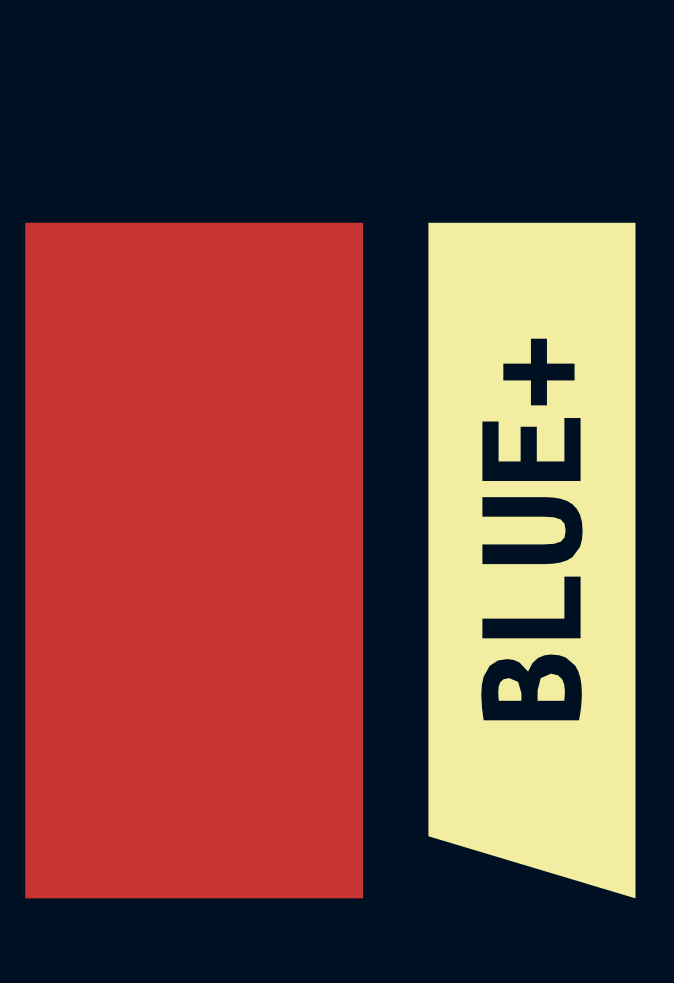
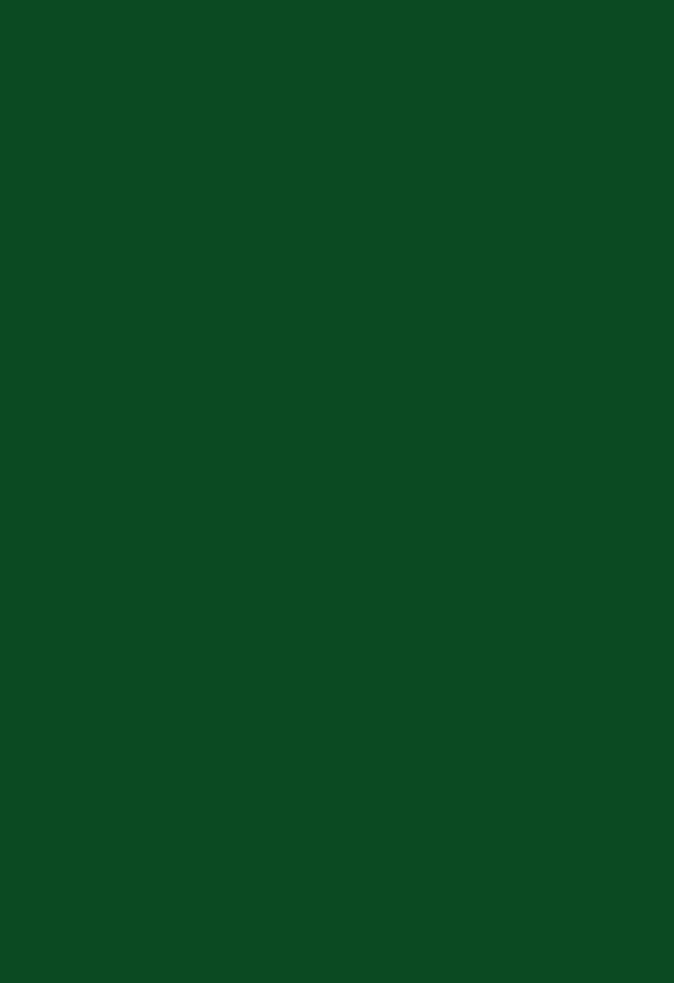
drawing: [428, 222, 636, 899] -> none
part: (194, 560) -> none

